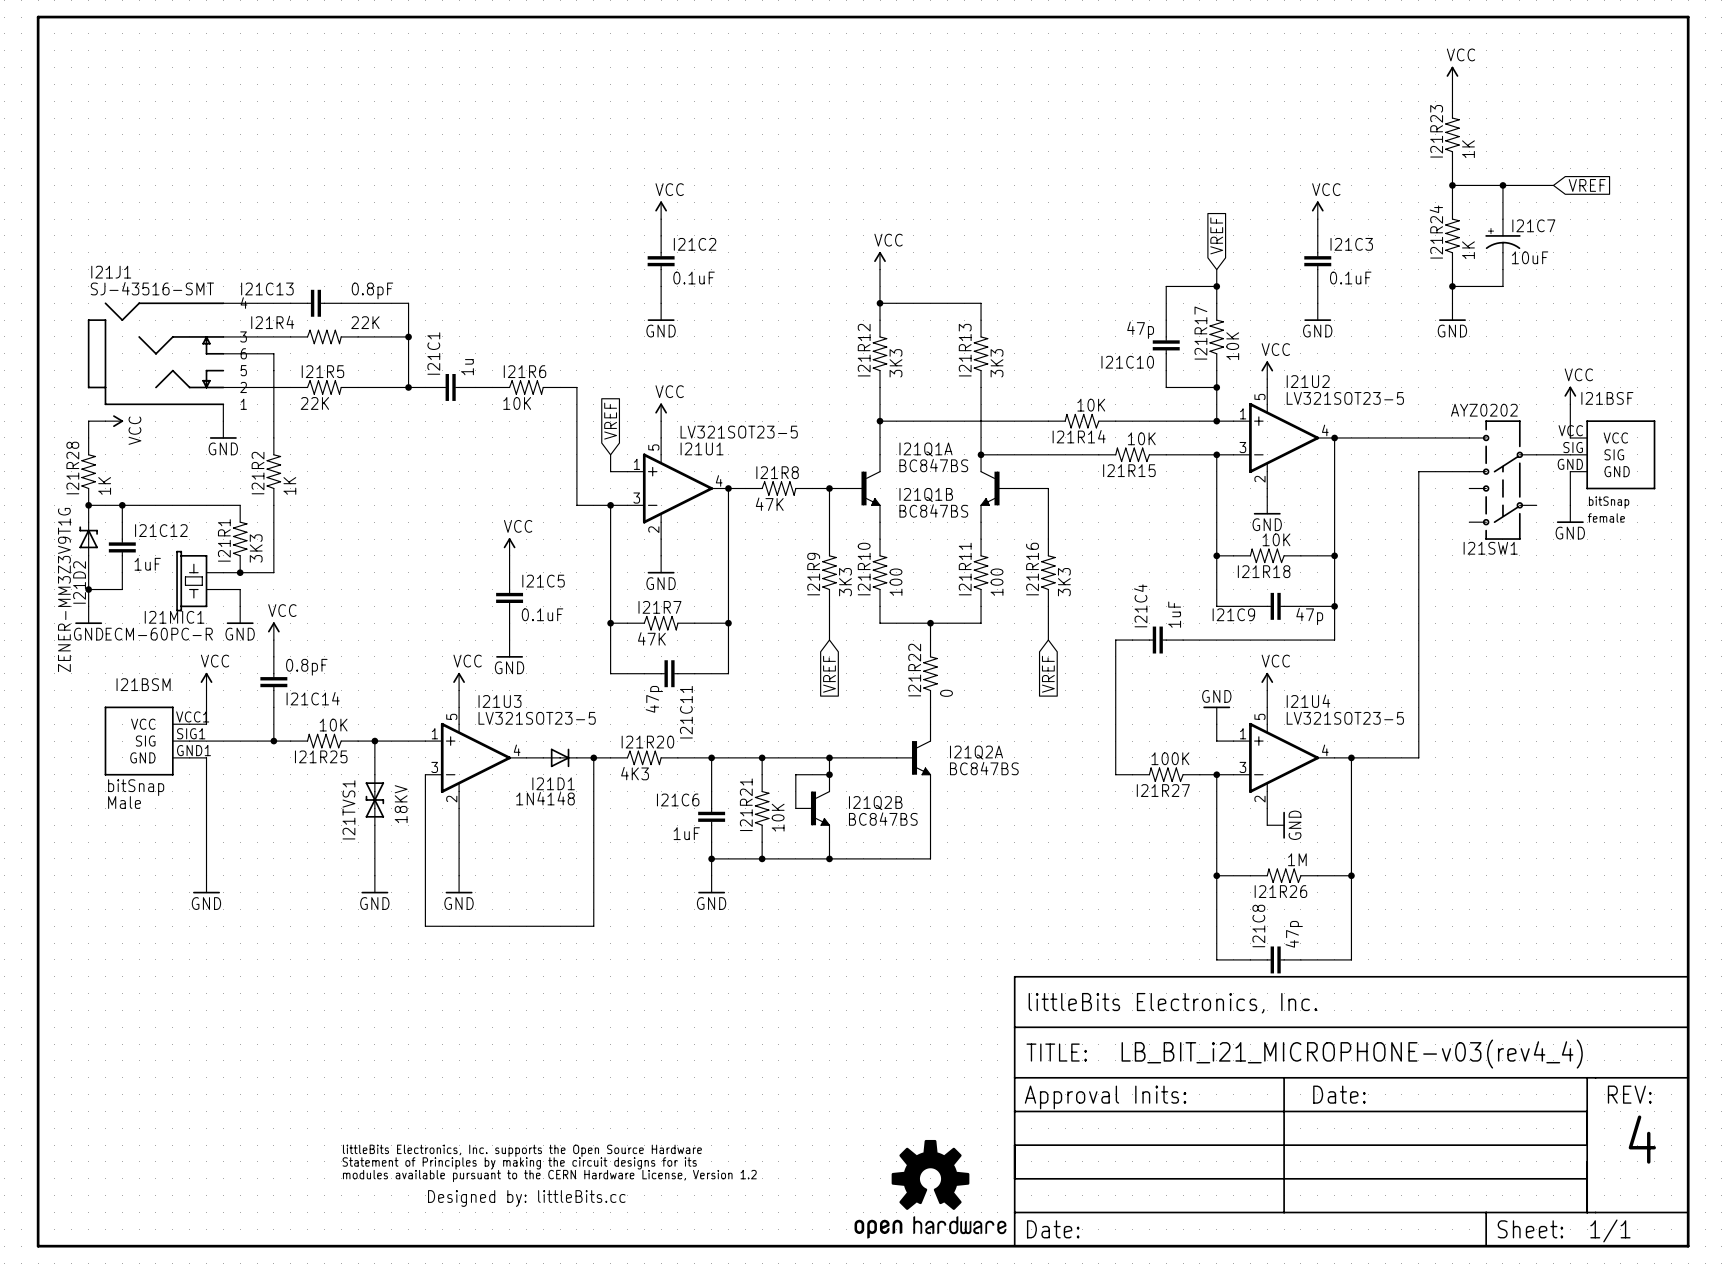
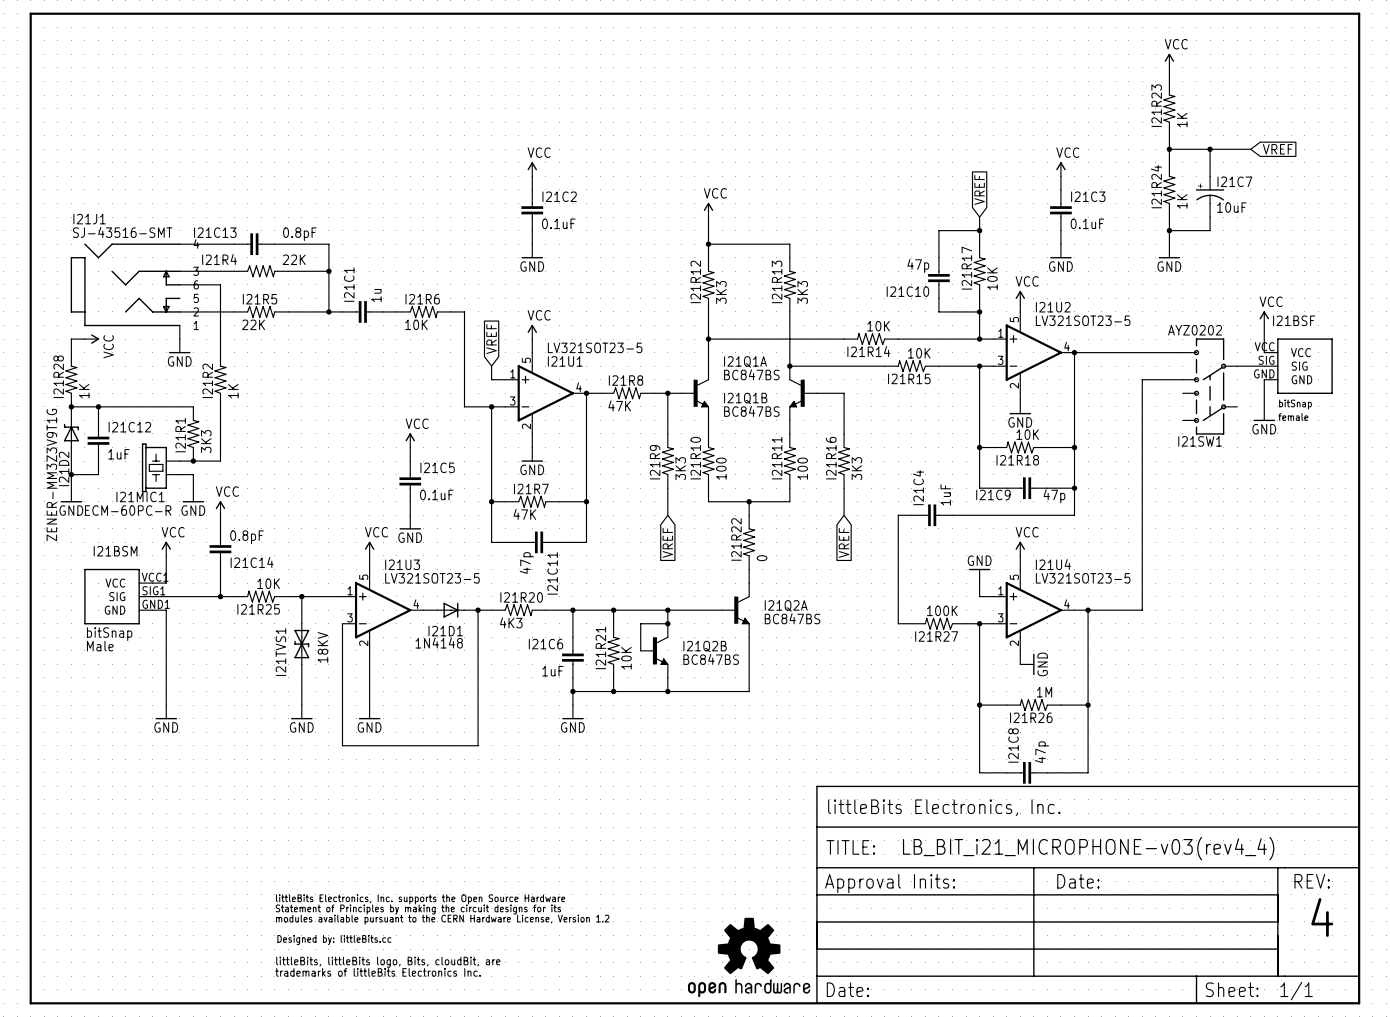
part: none -> (442, 935)
part: (549, 1175) -> none

